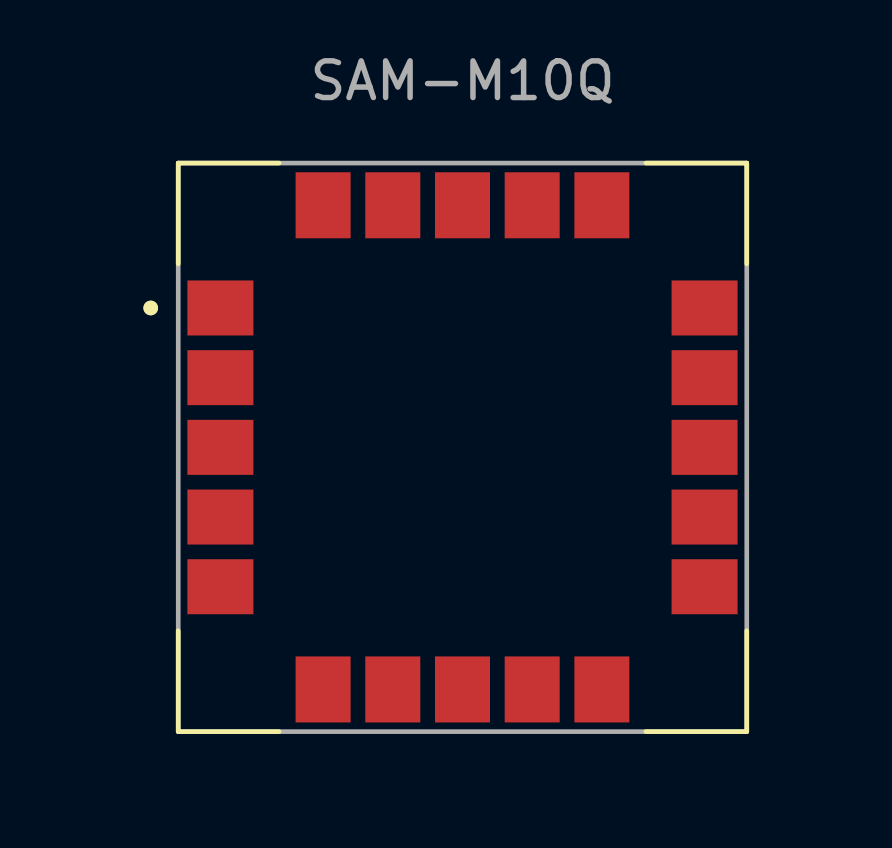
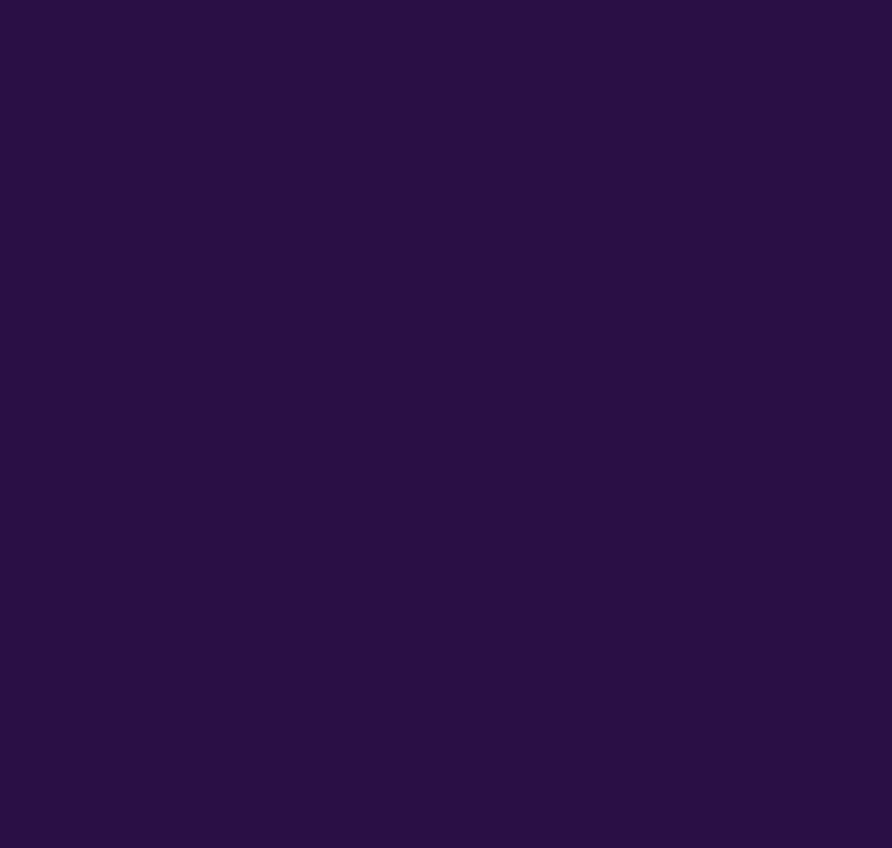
part: SAM-M10Q (446, 447) -> none

